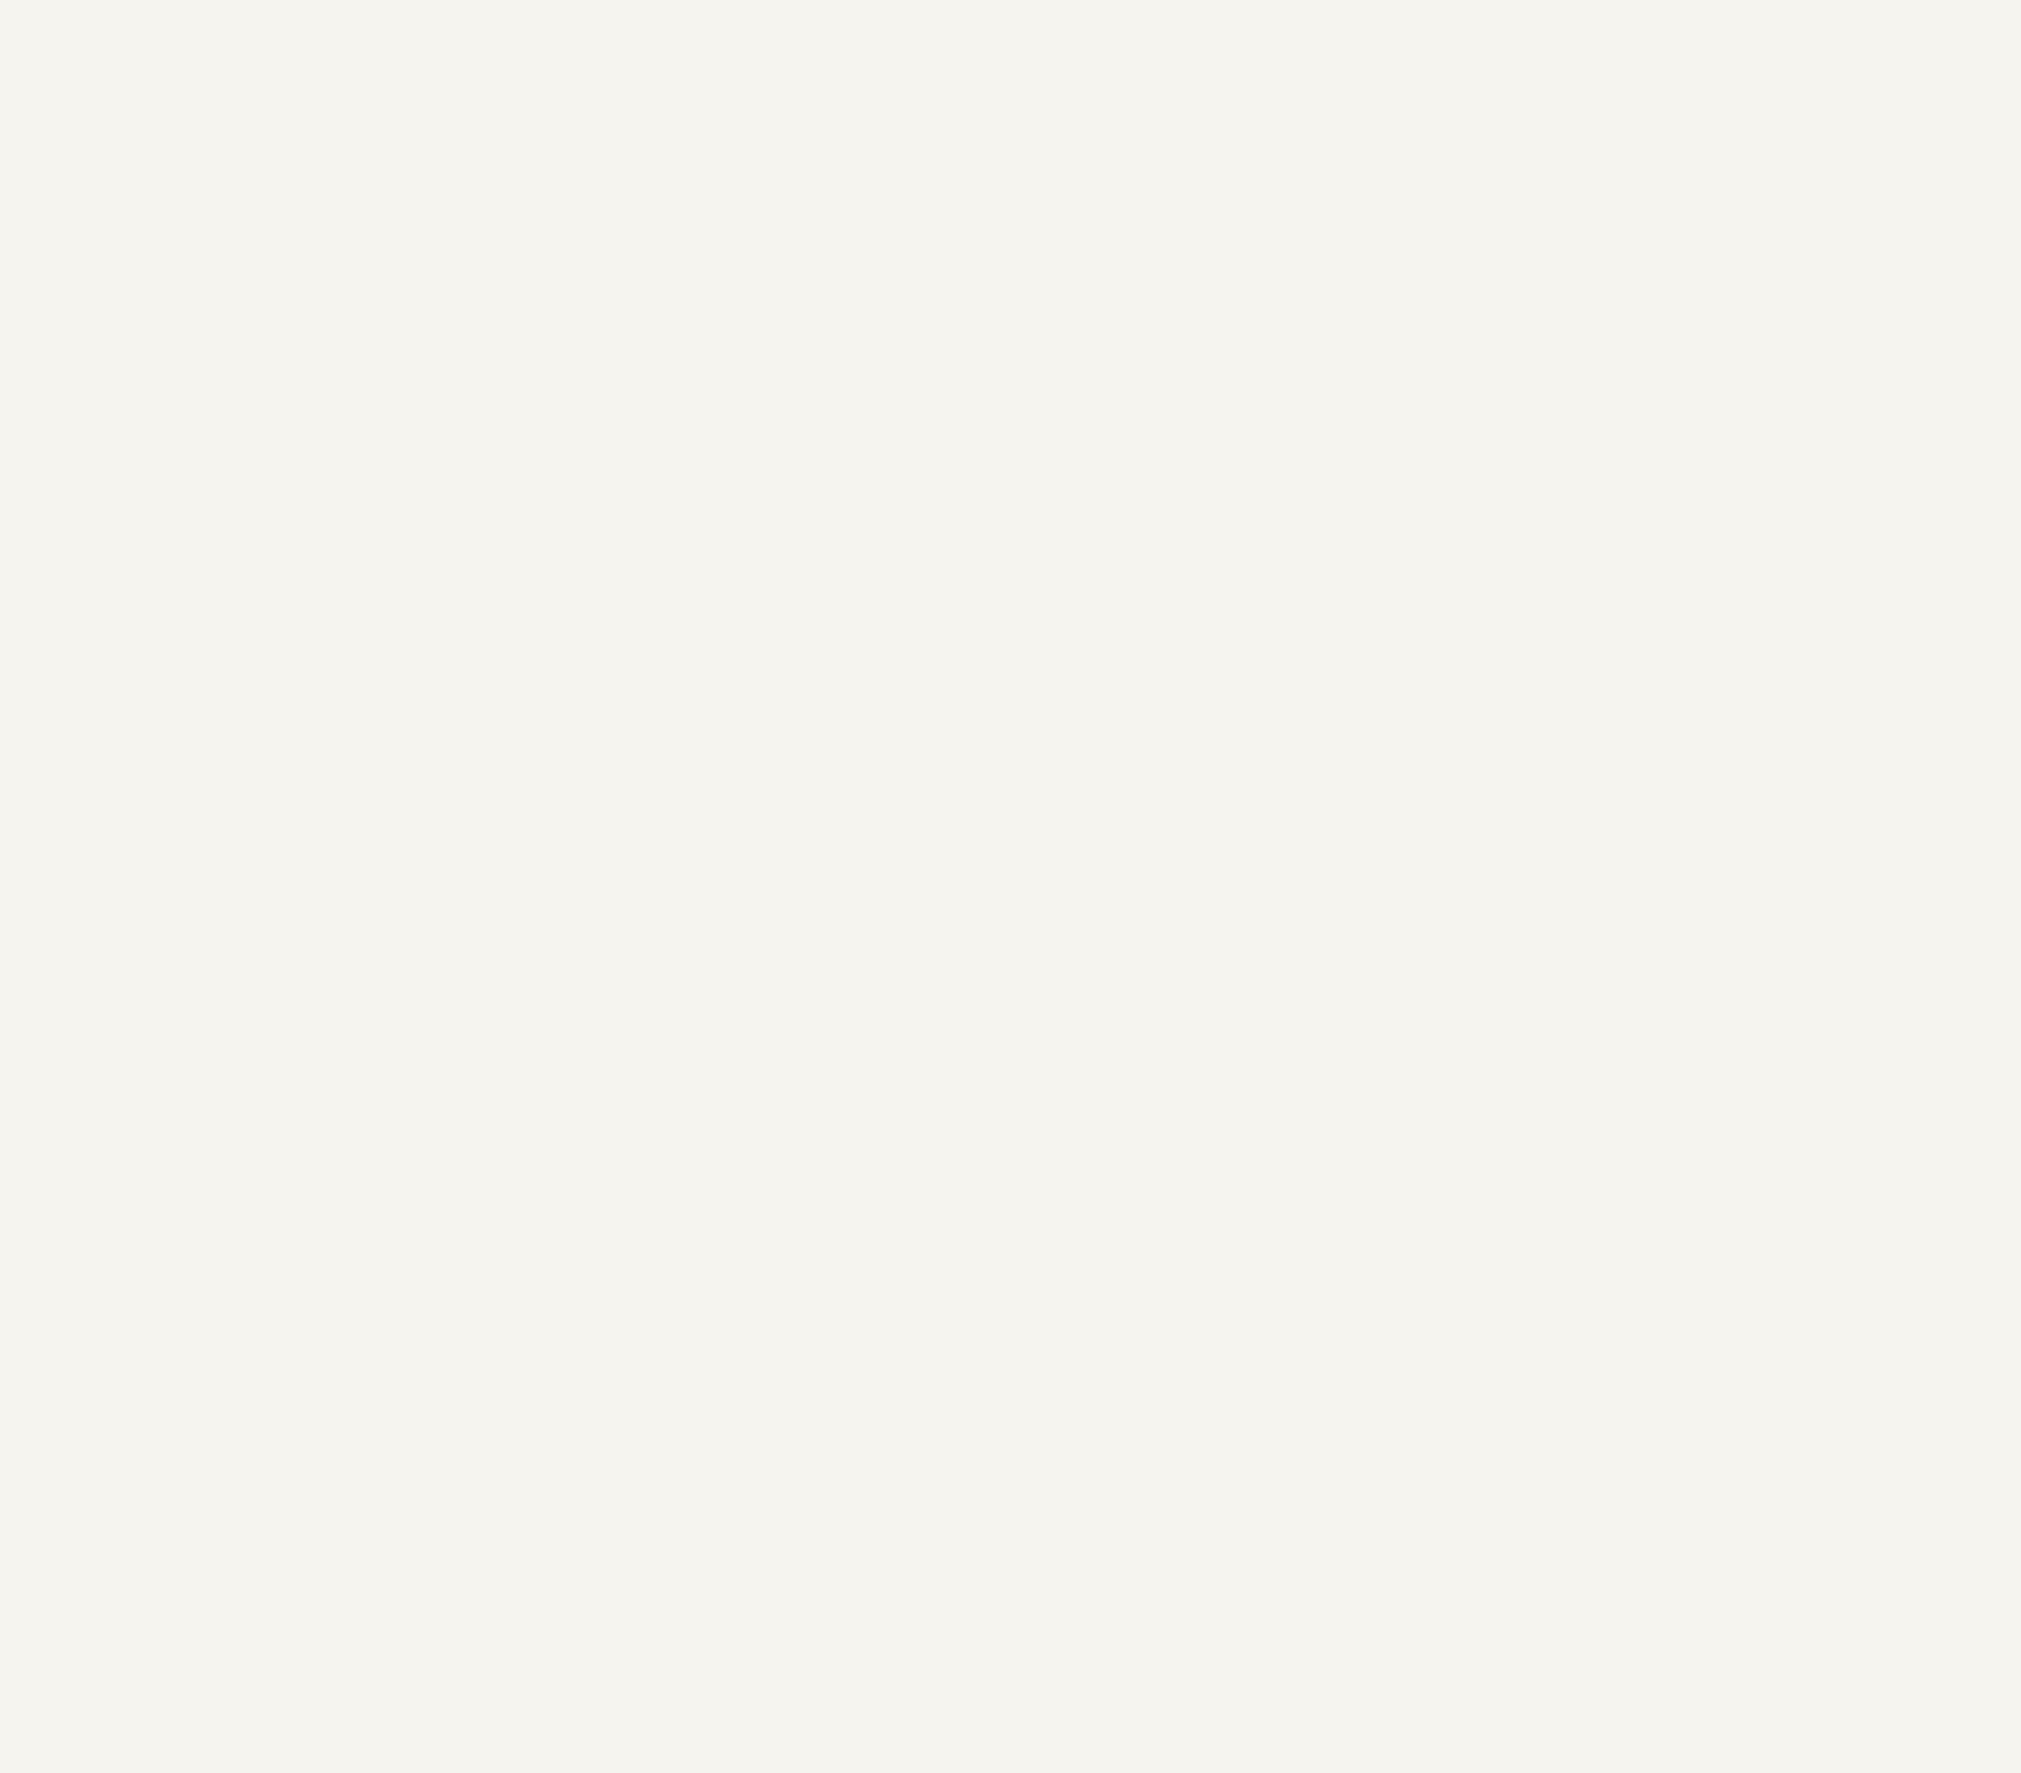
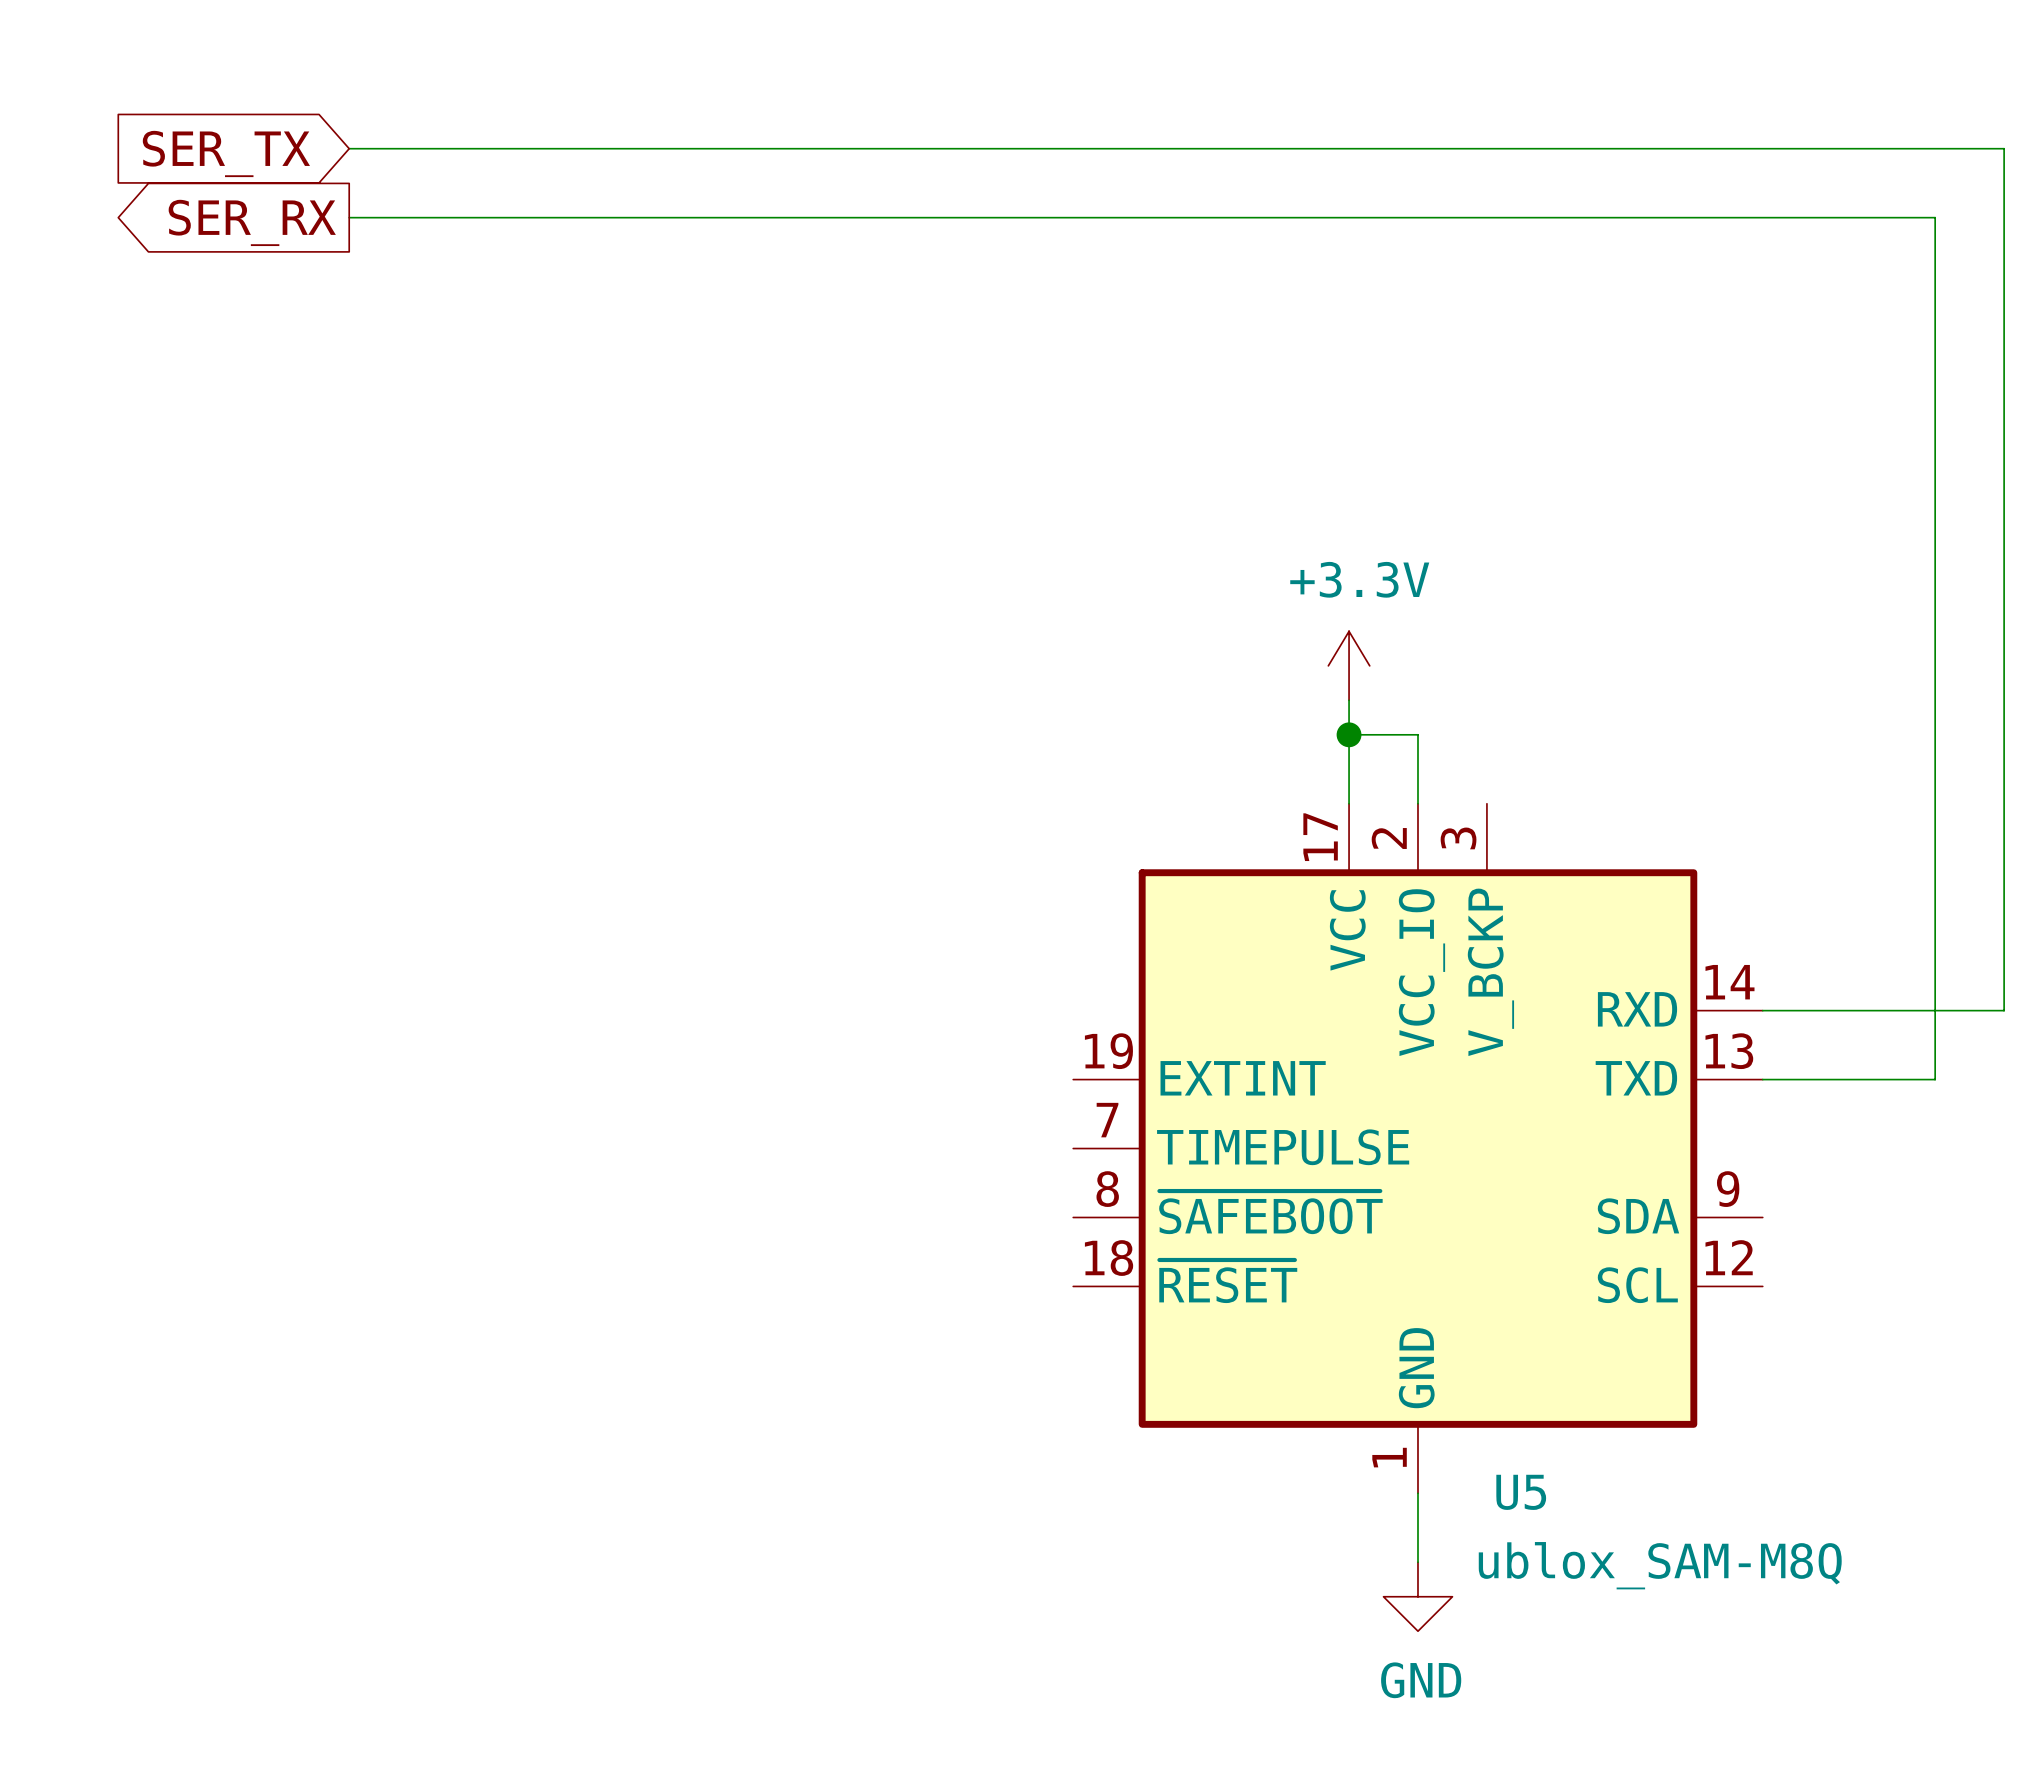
wire: none -> (349, 148) (2004, 148) (2004, 1010) (1762, 1010)
global label: none -> SER_TX (226, 153)
wire: none -> (349, 217) (1935, 217) (1935, 1079) (1762, 1079)
global label: none -> SER_RX (252, 222)
power symbol: none -> +3.3V (1349, 665)
wire: none -> (1349, 700) (1349, 803)
wire: none -> (1349, 734) (1417, 734) (1417, 803)
junction: none -> (1349, 734)
U5: none -> ublox_SAM-M8Q (1417, 1148)
wire: none -> (1417, 1493) (1417, 1562)
power symbol: none -> GND (1417, 1596)

